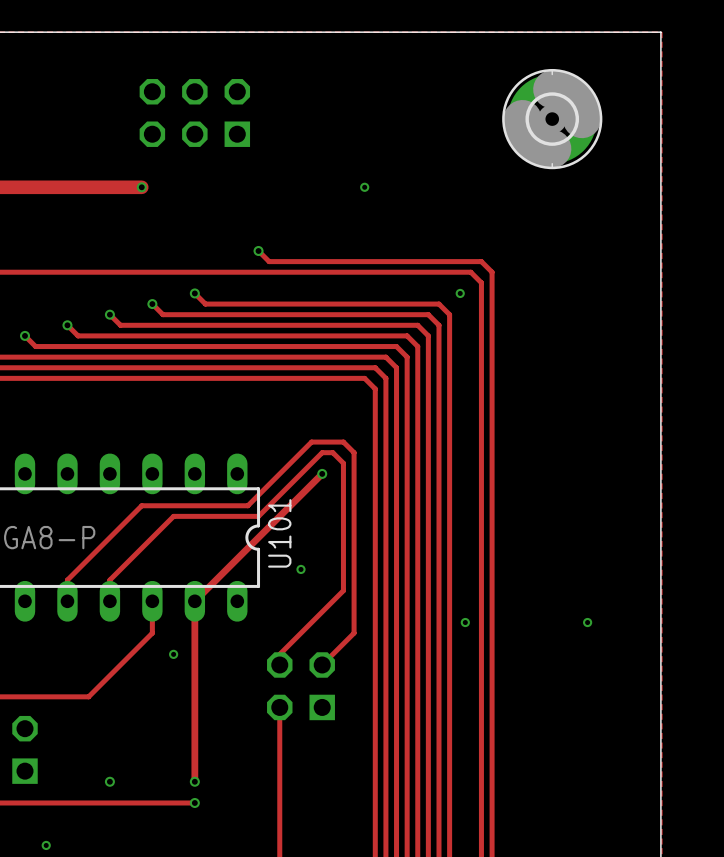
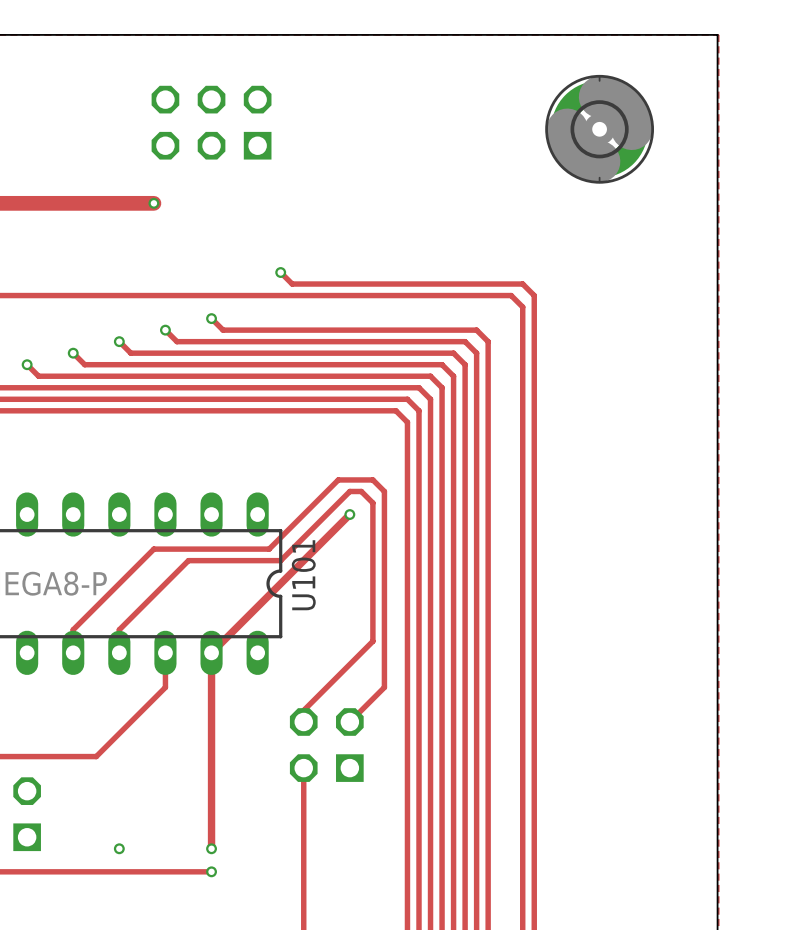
via: (364, 187) -> none
via: (460, 293) -> none
via: (300, 569) -> none
via: (465, 622) -> none
via: (587, 622) -> none
via: (173, 654) -> none
via: (46, 845) -> none

